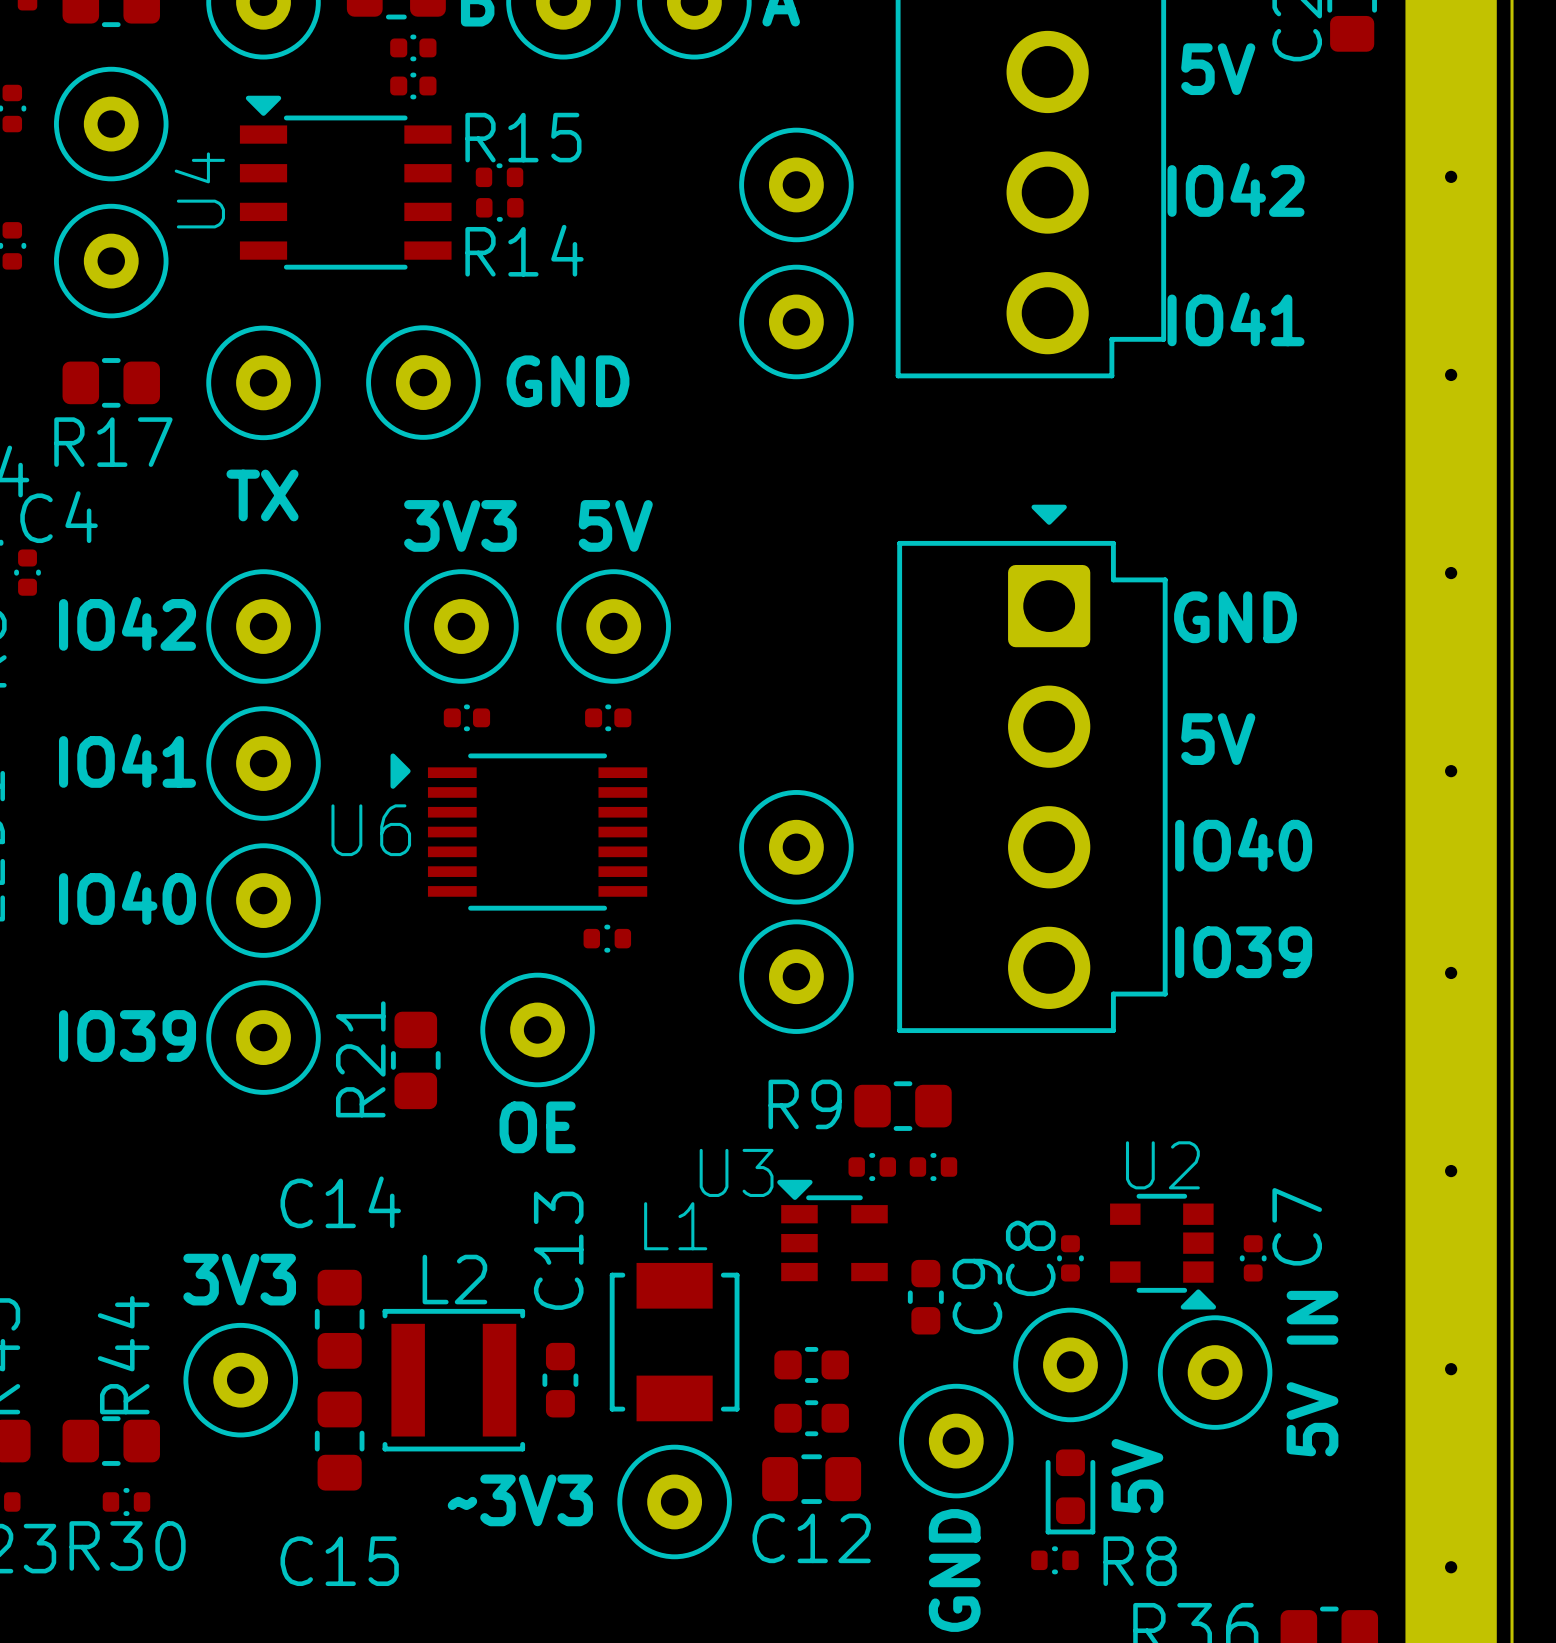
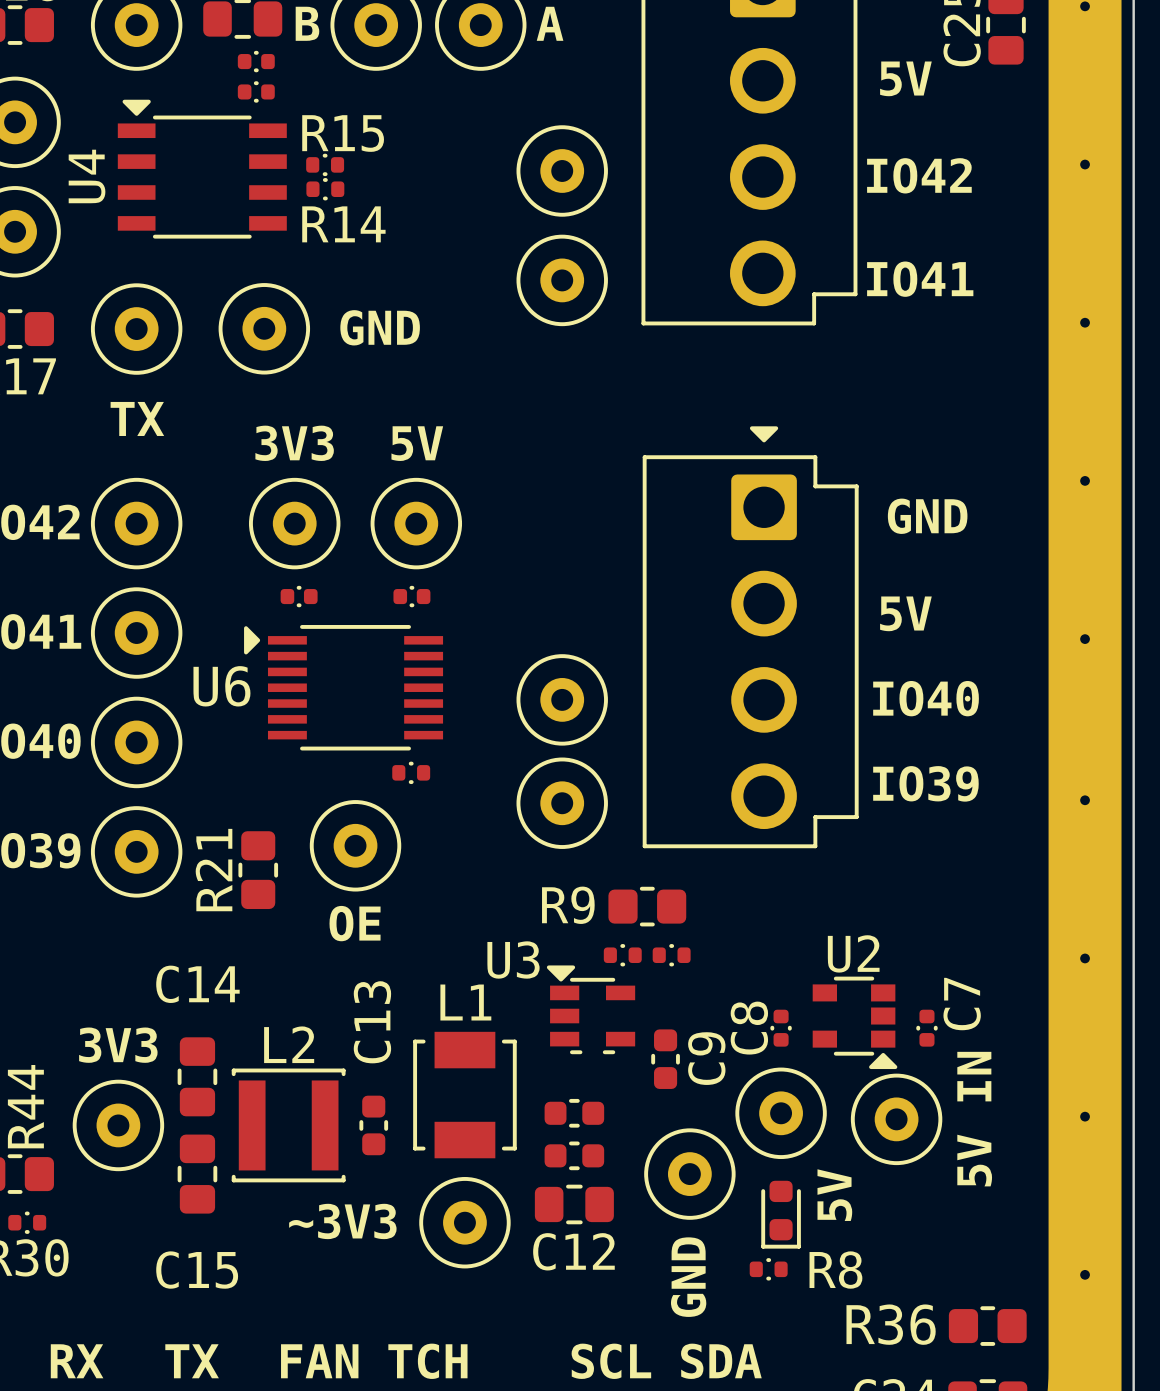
R15 footprint: [475, 163, 524, 188] -> [306, 153, 345, 177]
R14 footprint: [476, 198, 524, 222] -> [306, 178, 345, 201]
U6 footprint: [390, 753, 648, 911] -> [244, 624, 444, 751]
U3 footprint: [777, 1179, 888, 1282] -> [546, 965, 636, 1055]

